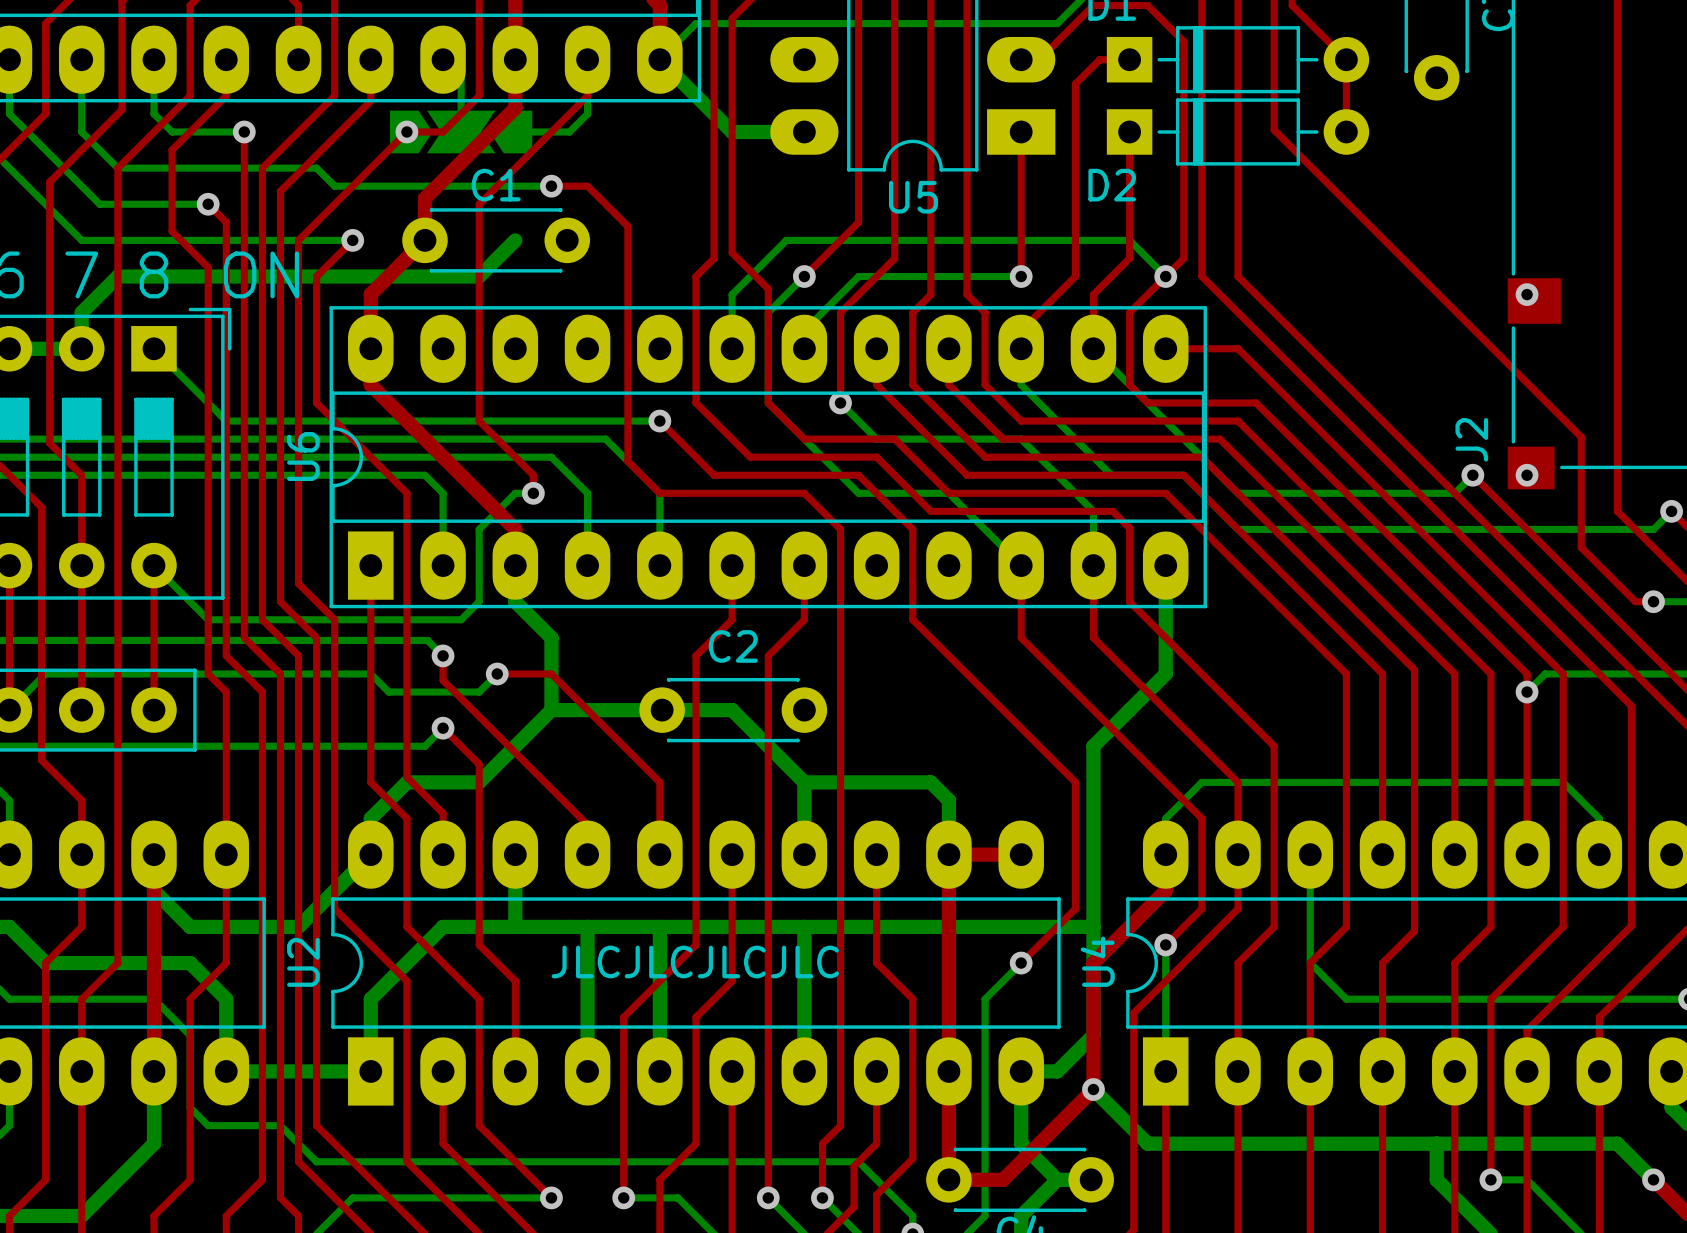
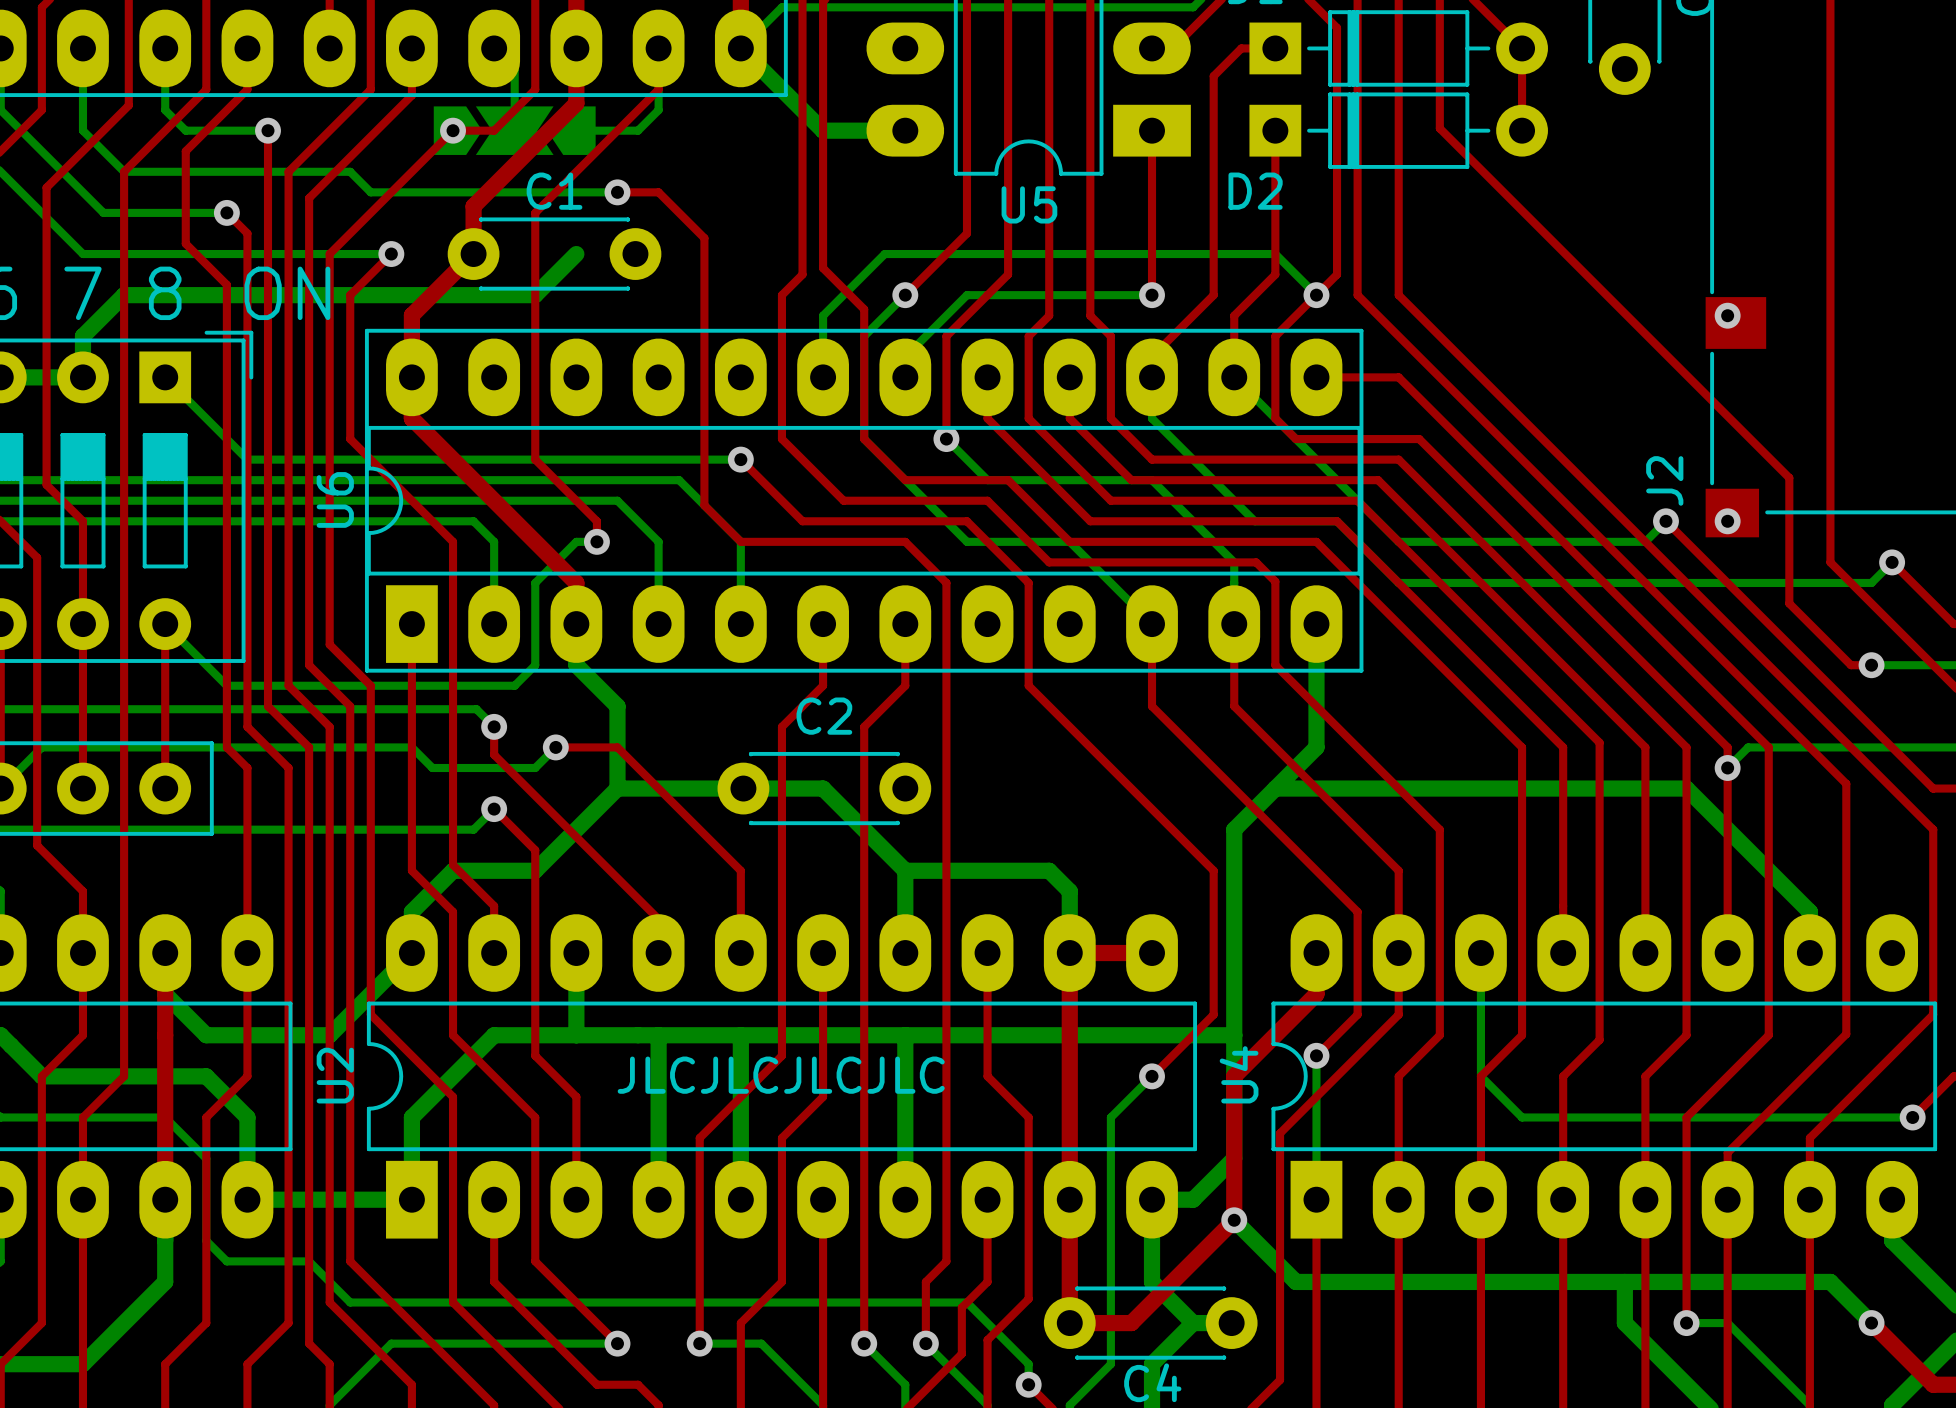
bottom track: (1563, 782) (1201, 782) (1165, 818) (1165, 854) -> (1768, 870) (1686, 788) (1275, 788)
bottom track width: thin (1563, 782) (1599, 818) (1599, 854) -> thick (1768, 870) (1809, 911) (1809, 953)

